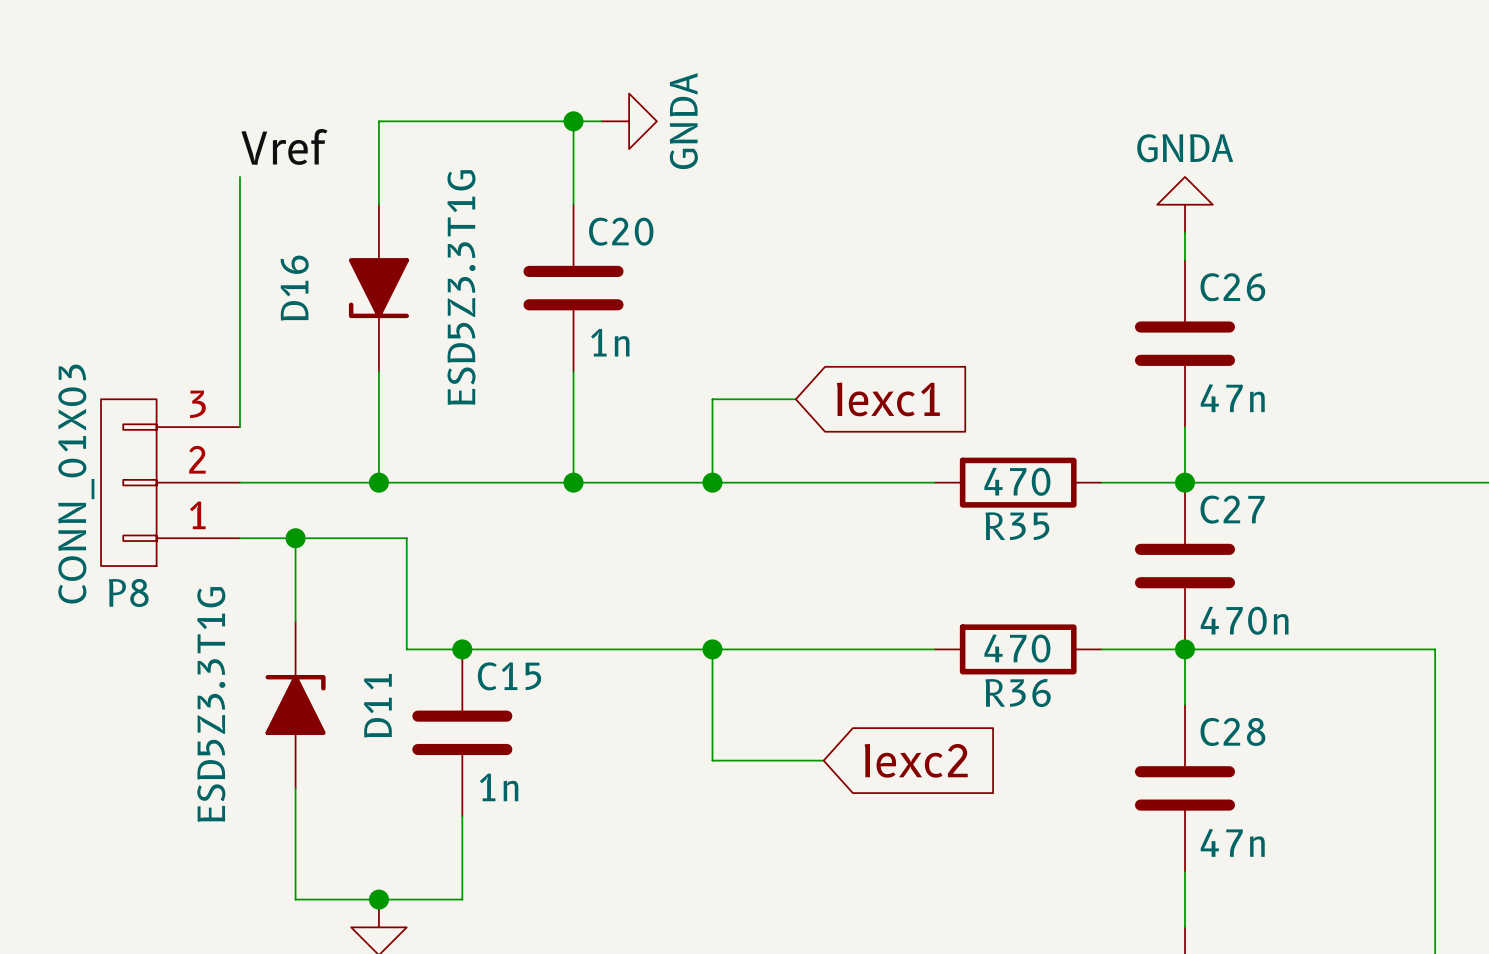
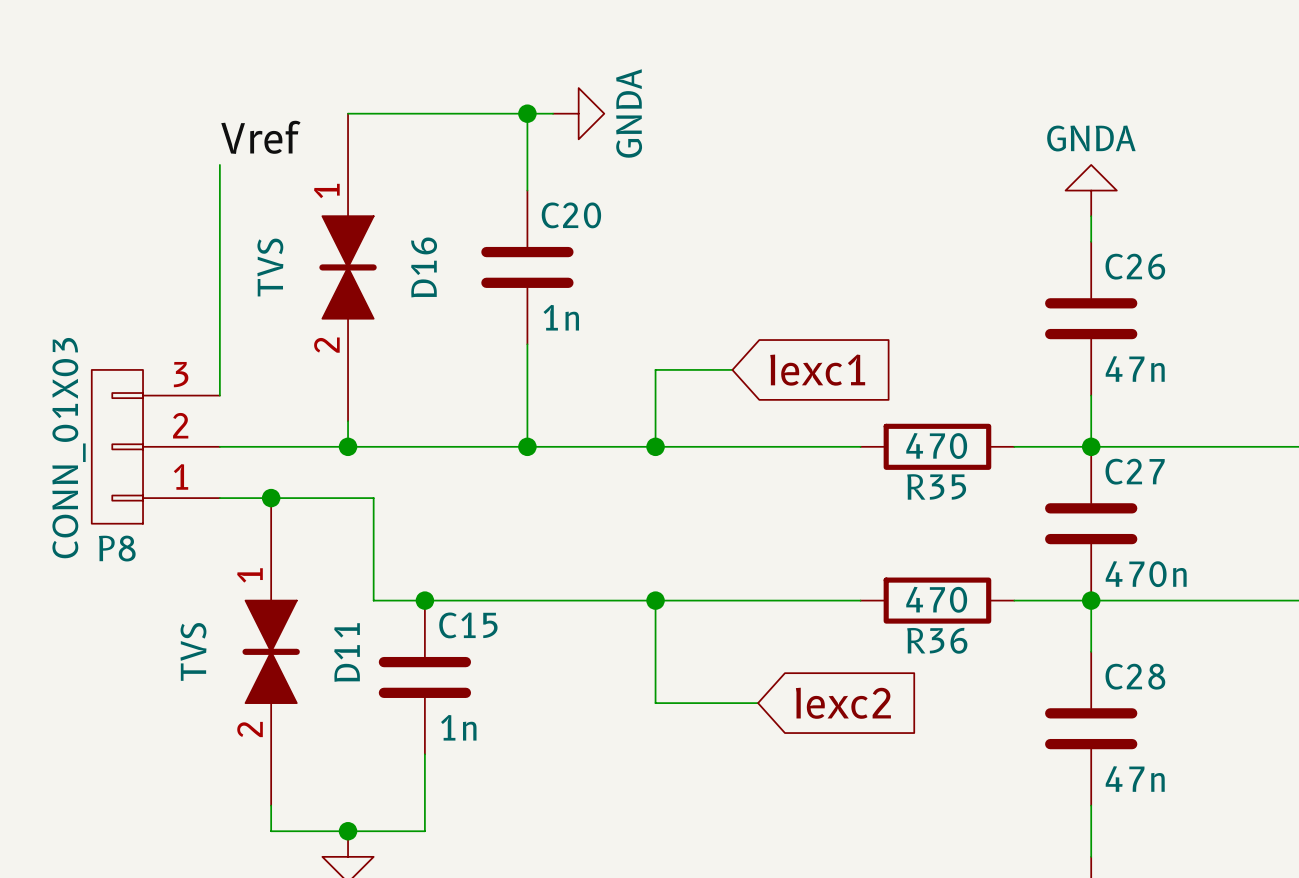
D16 symbol: [348, 204, 409, 372] -> [319, 113, 377, 422]
D16 value: ESD5Z3.3T1G (461, 287) -> TVS (270, 267)
D16 name position: D16 (294, 288) -> D16 (424, 267)
D11 symbol: [265, 621, 326, 789] -> [242, 498, 300, 806]
D11 value: ESD5Z3.3T1G (211, 704) -> TVS (193, 651)

